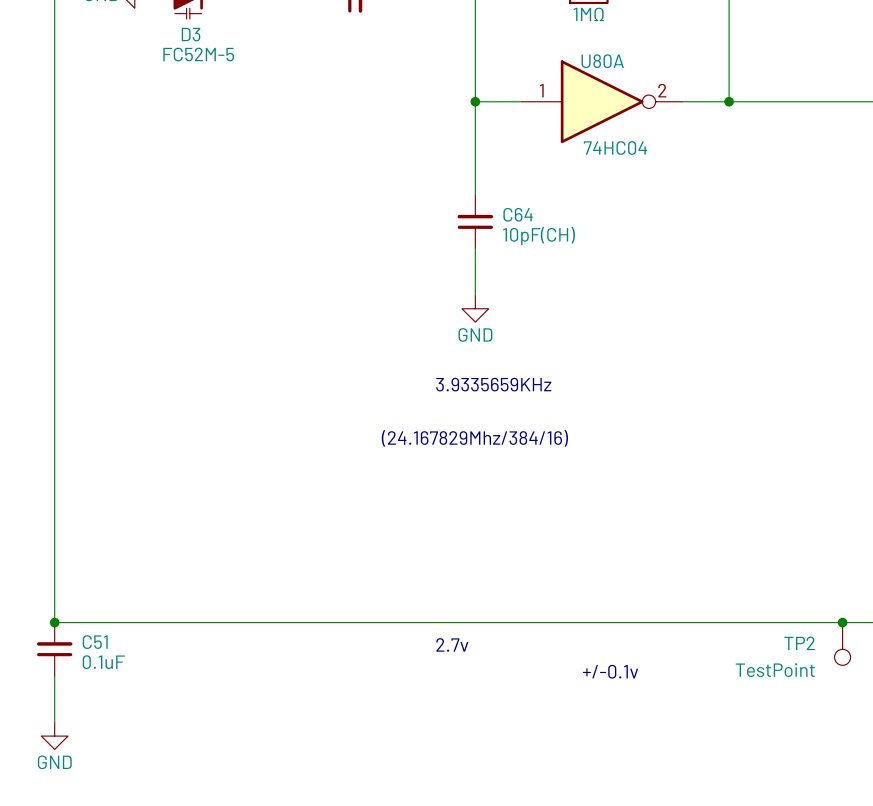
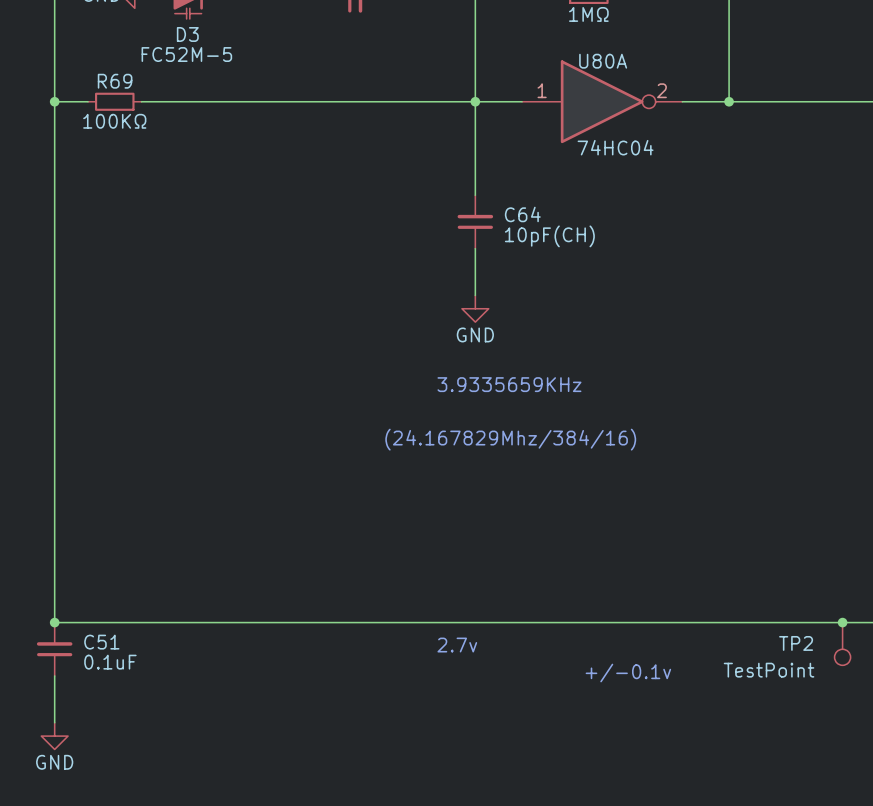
wire: none -> (54, 101) (88, 101)
junction: none -> (54, 101)
R69: none -> 100KΩ (114, 101)
wire: none -> (141, 101) (475, 101)

